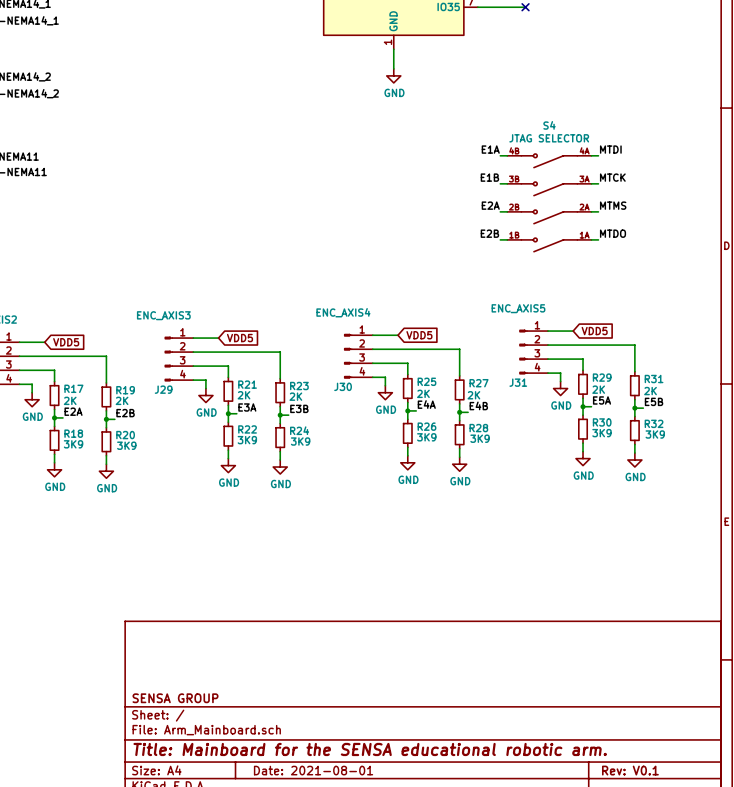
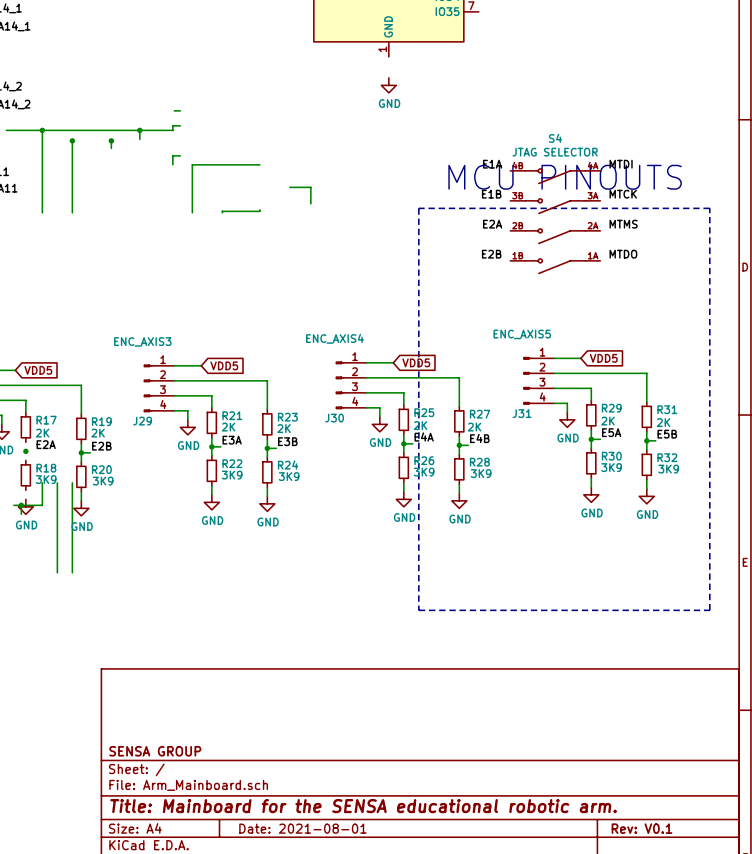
wire: (477, 7) (525, 7) -> none
no-connect mark: (525, 7) -> none
wire: (393, 49) (393, 68) -> none
wire: none -> (174, 110) (180, 110)
wire: none -> (180, 125) (172, 125) (172, 130) (6, 130)
wire: none -> (42, 130) (42, 212)
junction: none -> (42, 130)
wire: none -> (139, 130) (139, 139)
junction: none -> (139, 130)
wire: none -> (72, 140) (72, 212)
junction: none -> (72, 140)
wire: none -> (111, 140) (111, 148)
junction: none -> (111, 140)
wire: none -> (180, 155) (172, 155) (172, 164)
wire: none -> (259, 164) (192, 164) (192, 212)
wire: (500, 155) (507, 155) -> none
wire: (591, 155) (598, 155) -> none
text: none -> MCU PINOUTS (565, 177)
wire: none -> (289, 187) (310, 187) (310, 203)
wire: (500, 183) (507, 183) -> none
wire: (591, 183) (598, 183) -> none
line: none -> (418, 208) (709, 208) (709, 610) (418, 610) (418, 208)
wire: none -> (259, 209) (222, 212)
wire: (500, 211) (507, 211) -> none
wire: (591, 211) (598, 211) -> none
wire: (500, 239) (507, 239) -> none
wire: (591, 239) (598, 239) -> none
wire: (54, 409) (54, 426) -> none
wire: (54, 417) (62, 417) -> none
wire: none -> (42, 482) (42, 505) (13, 505)
wire: none -> (57, 482) (57, 572)
wire: none -> (72, 482) (72, 572)
wire: (54, 454) (54, 462) -> (21, 505) (21, 514)
junction: none -> (21, 505)

